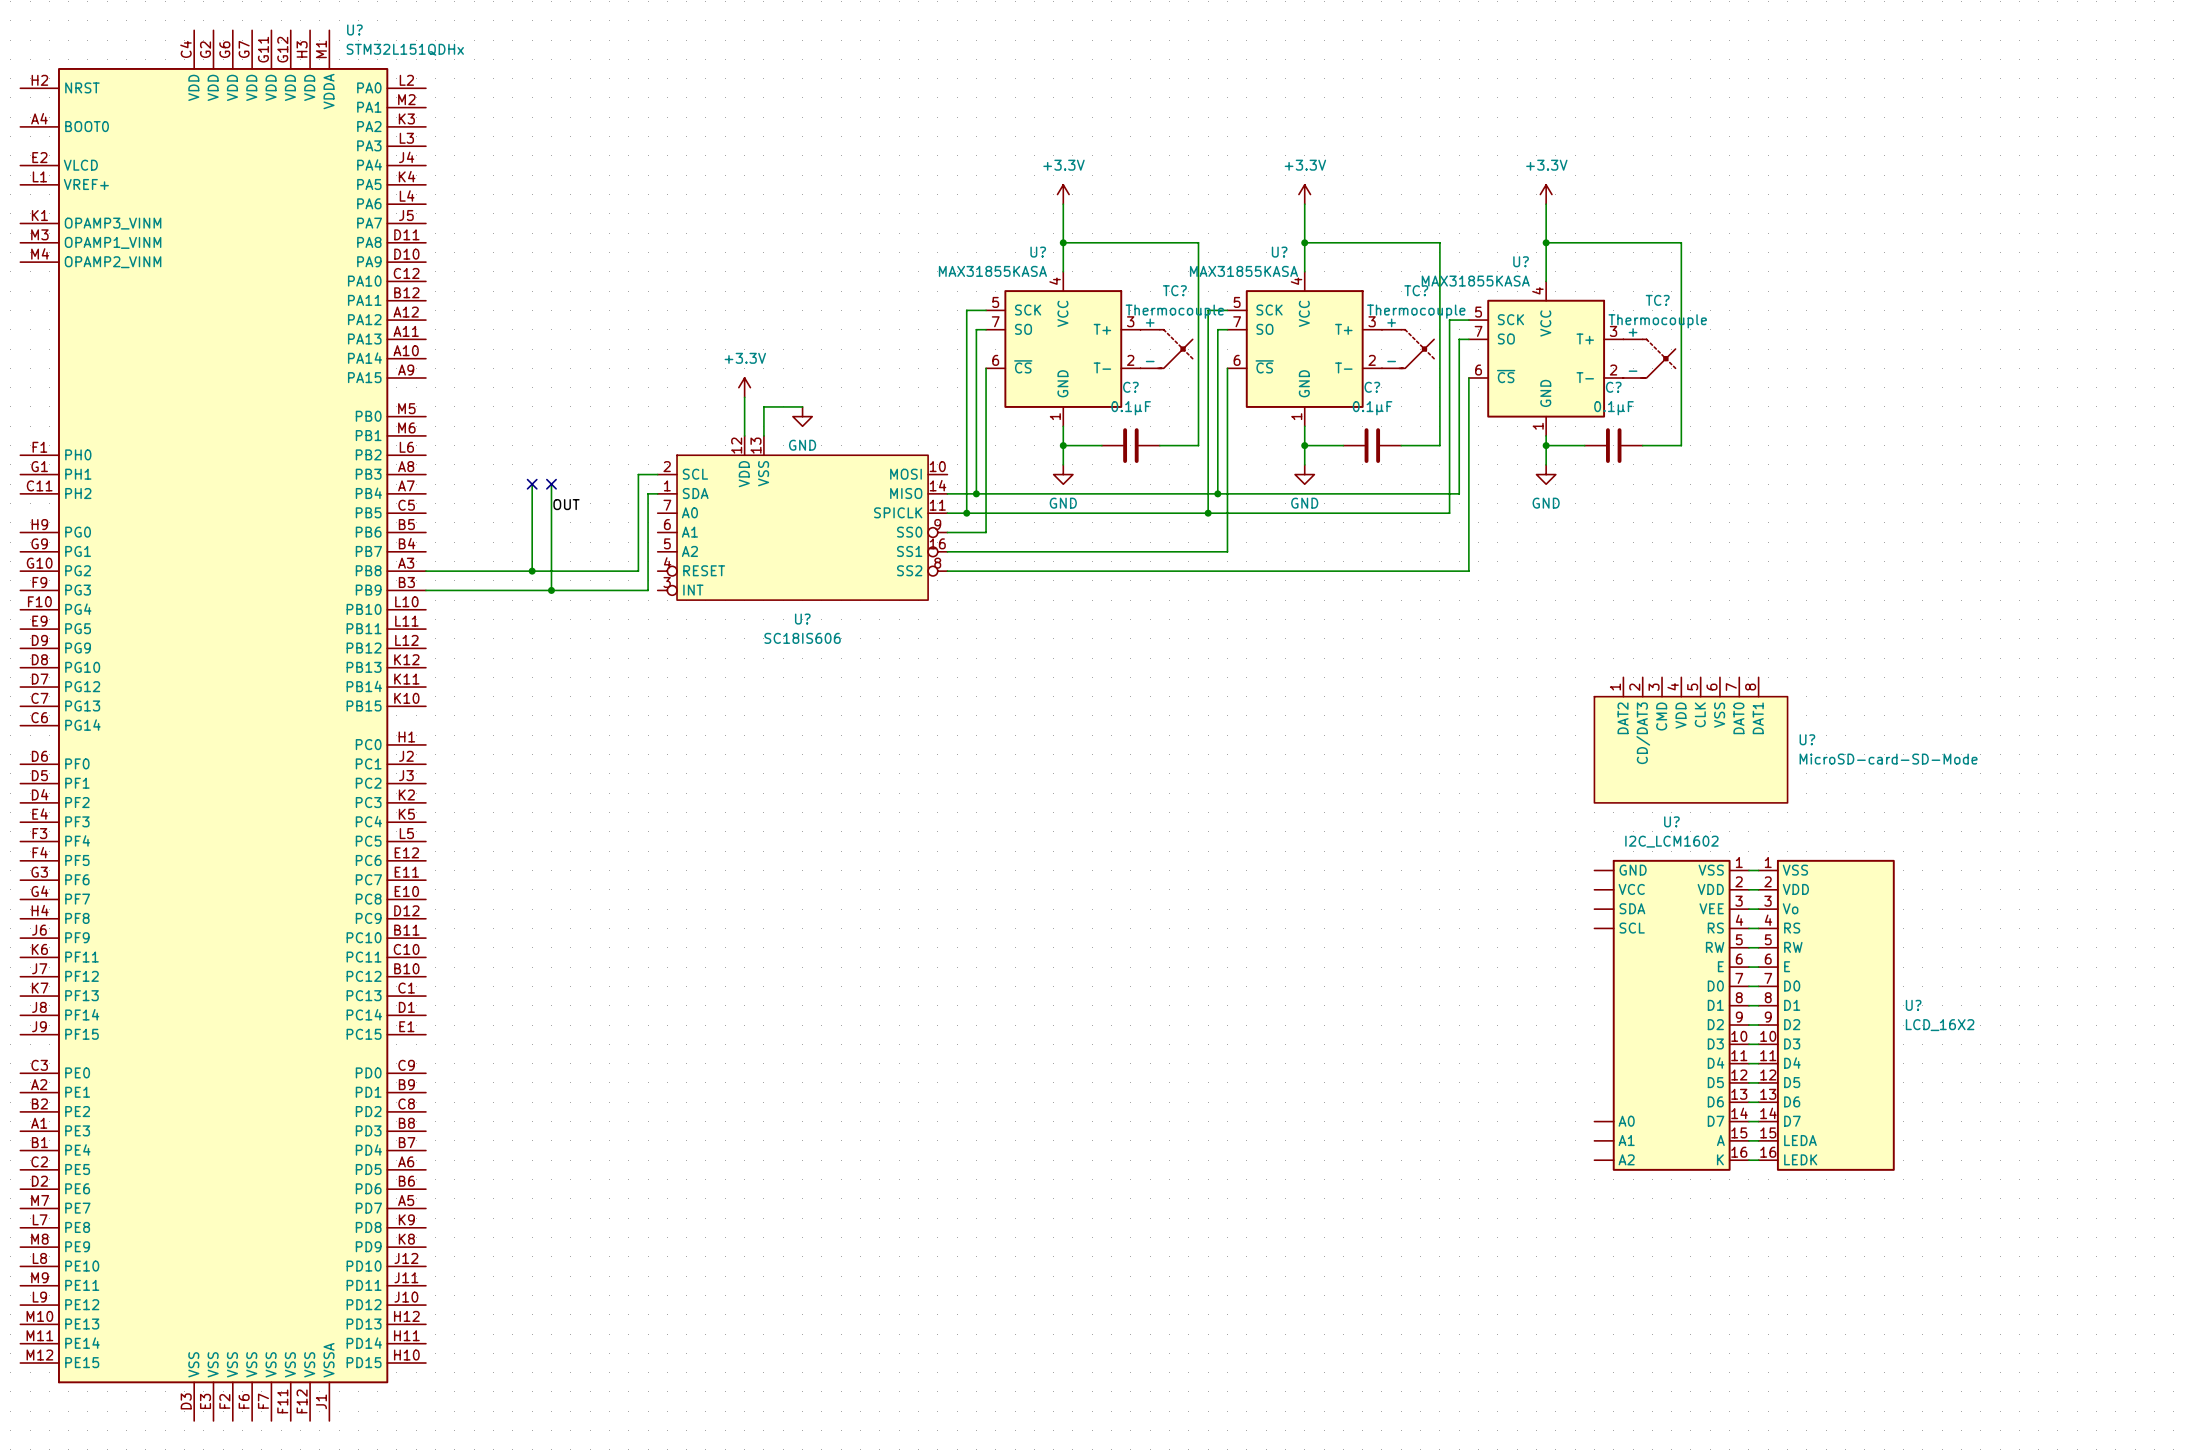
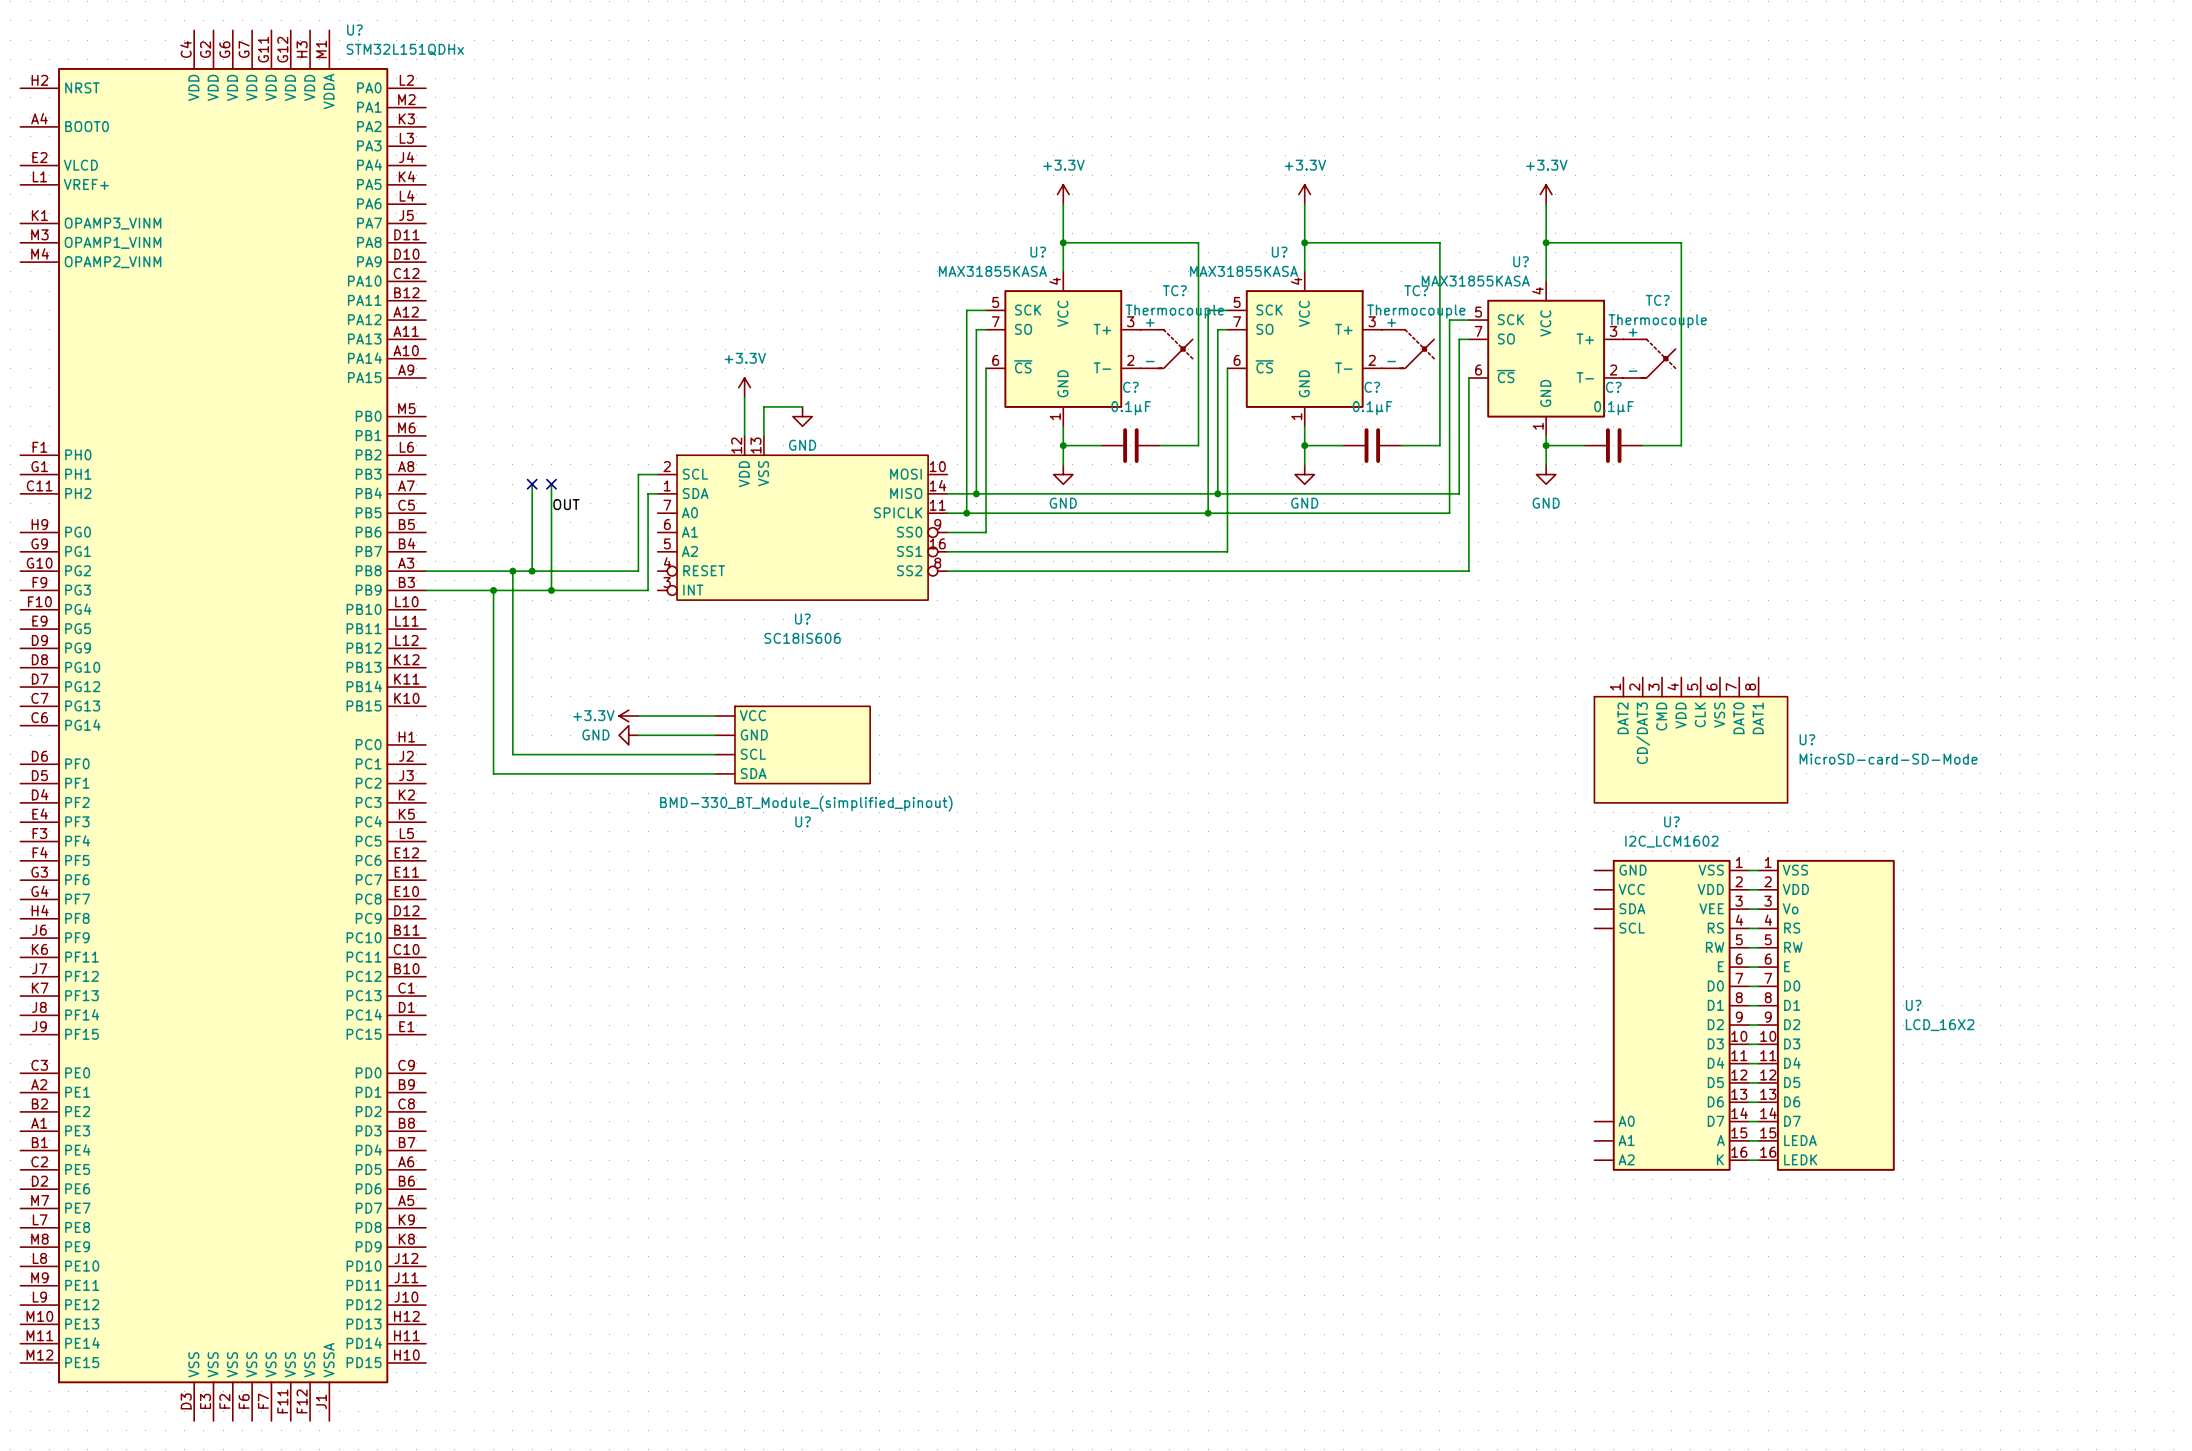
wire: none -> (512, 571) (512, 754) (715, 754)
junction: none -> (512, 571)
wire: none -> (493, 590) (493, 773) (715, 773)
junction: none -> (493, 590)
power symbol: none -> +3.3V (628, 715)
wire: none -> (638, 715) (715, 715)
power symbol: none -> GND (628, 735)
wire: none -> (638, 735) (715, 735)
U?: none -> BMD-330_BT_Module_(simplified_pinout) (792, 744)

